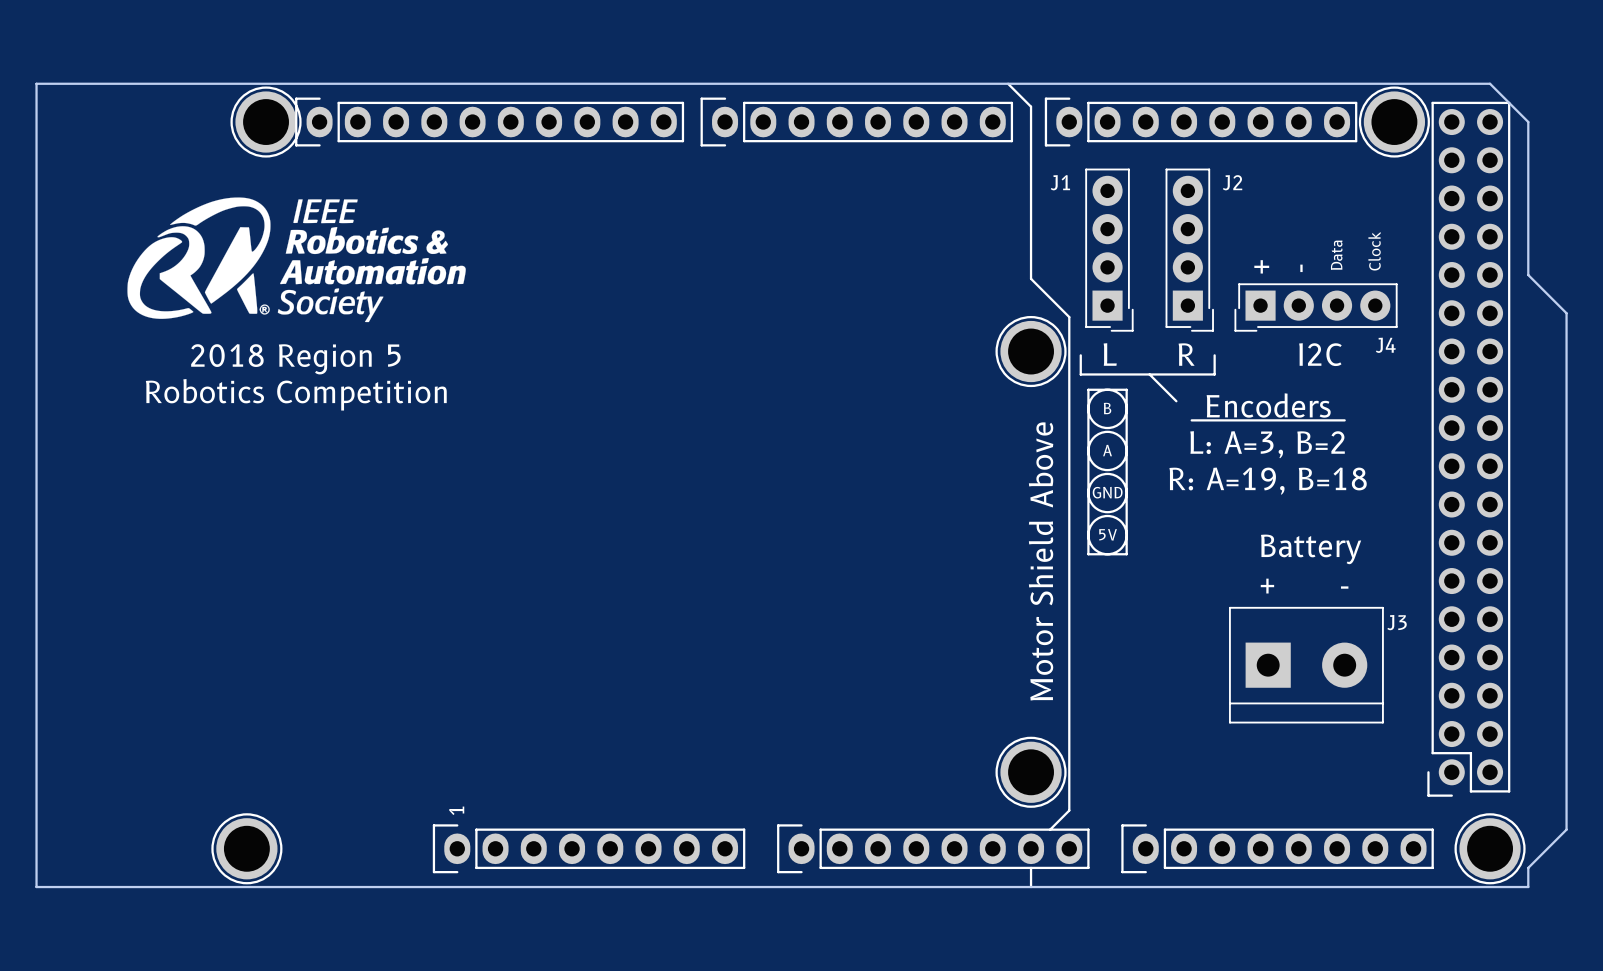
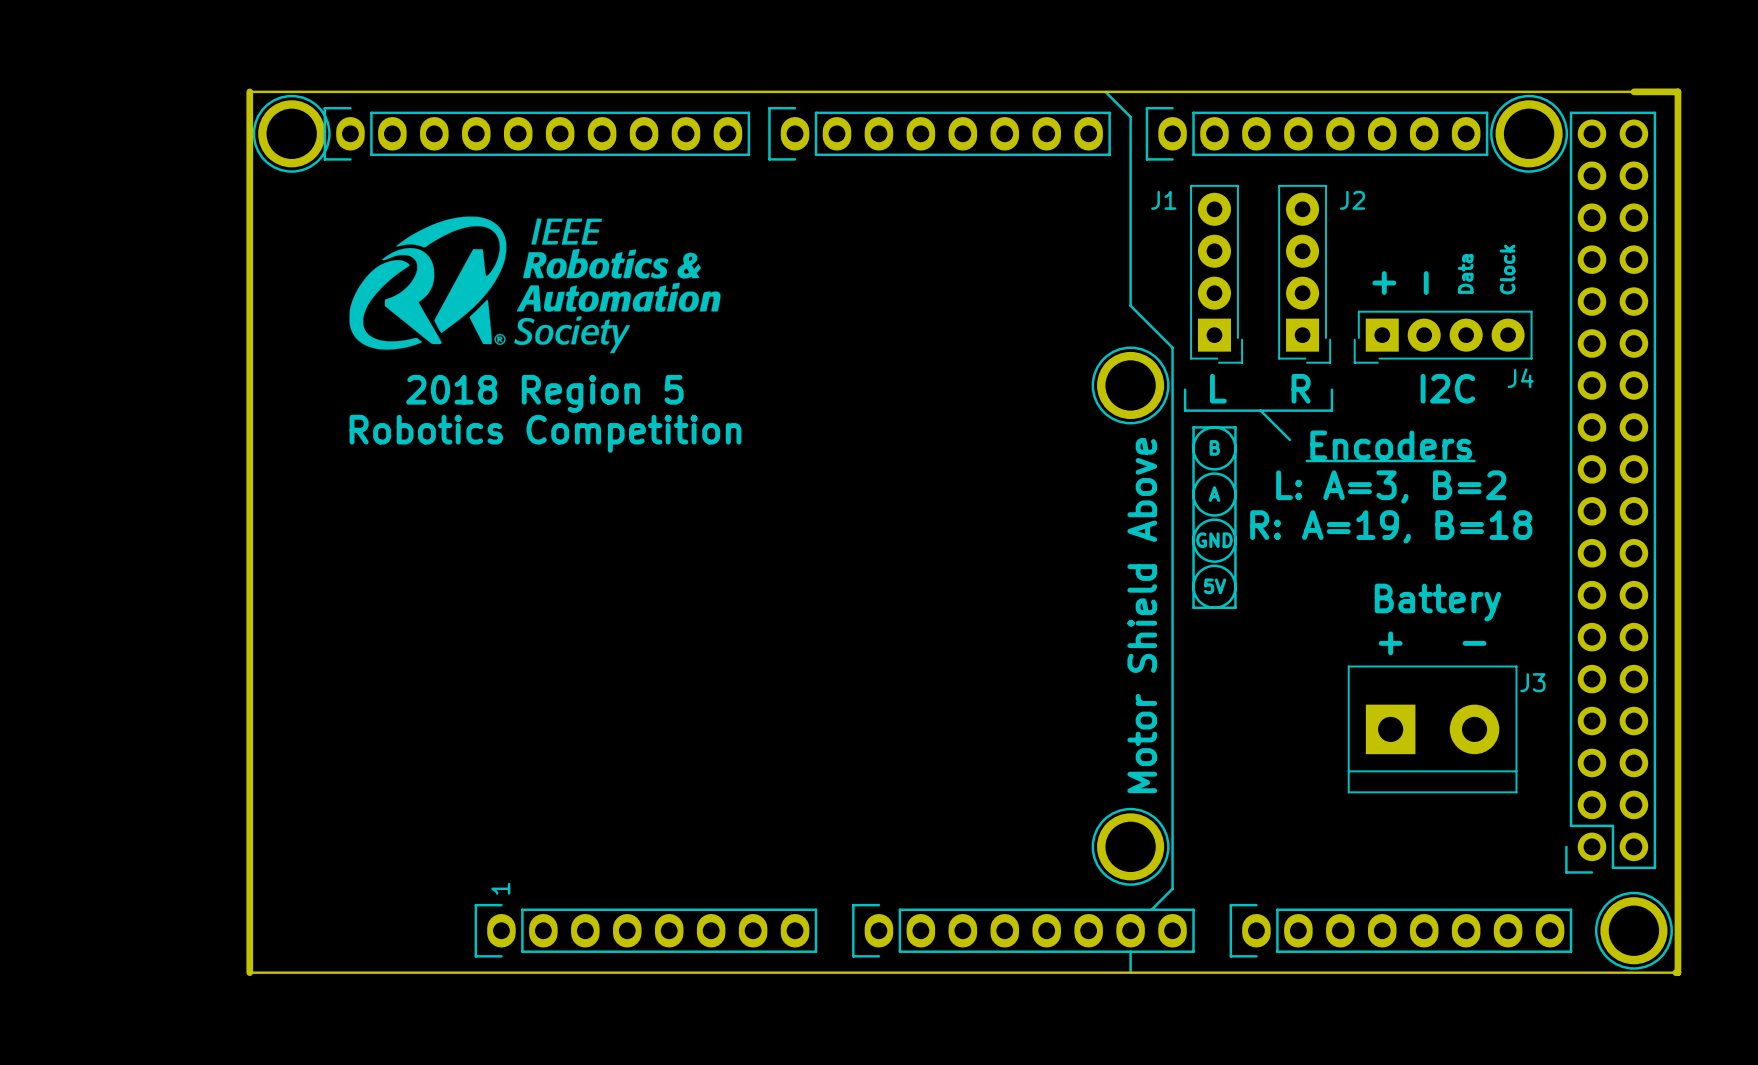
board edge: (227, 83) (36, 83) (36, 887) (227, 887) -> (249, 91) (249, 972)
board edge: (1490, 83) (1528, 122) (1528, 275) (1566, 313) (1566, 829) (1528, 867) (1528, 887) -> (1633, 91) (1677, 91) (1677, 972) (1675, 972)
drawing position: (296, 259) -> (534, 284)
text position: 2018 Region 5 (295, 359) -> 2018 Region 5 (544, 393)
text position: Robotics Competition (296, 394) -> Robotics Competition (545, 433)
part: (246, 848) -> none

